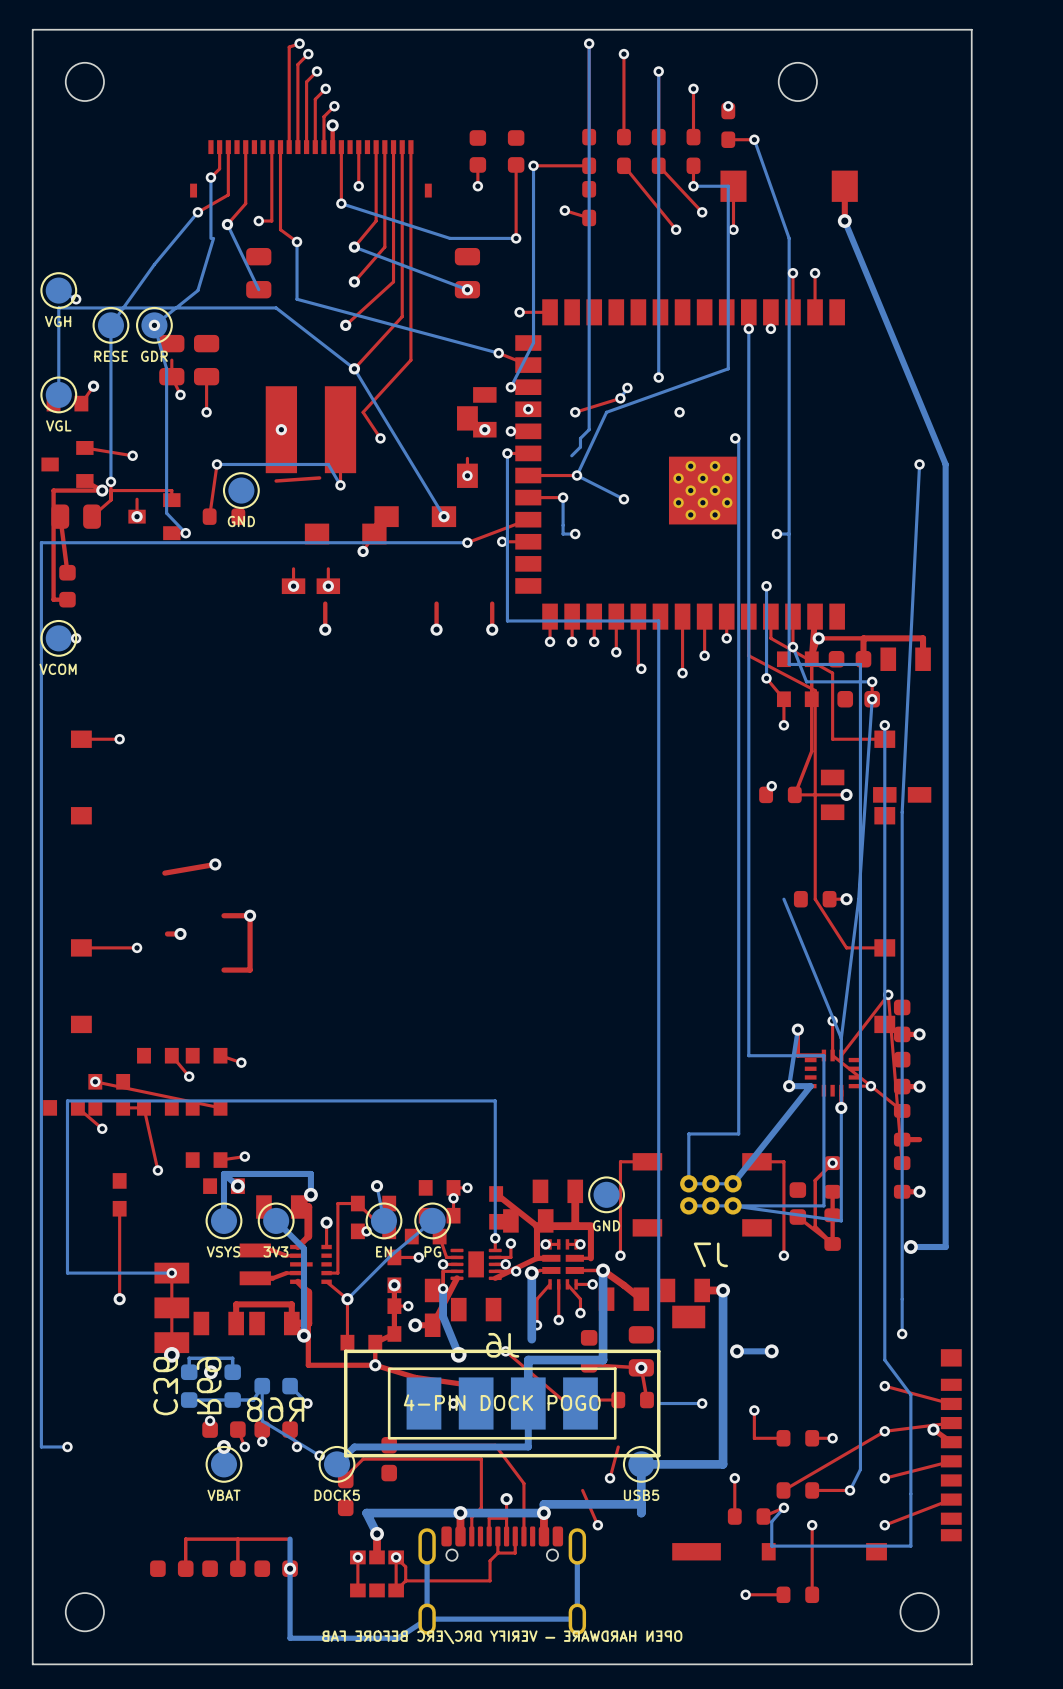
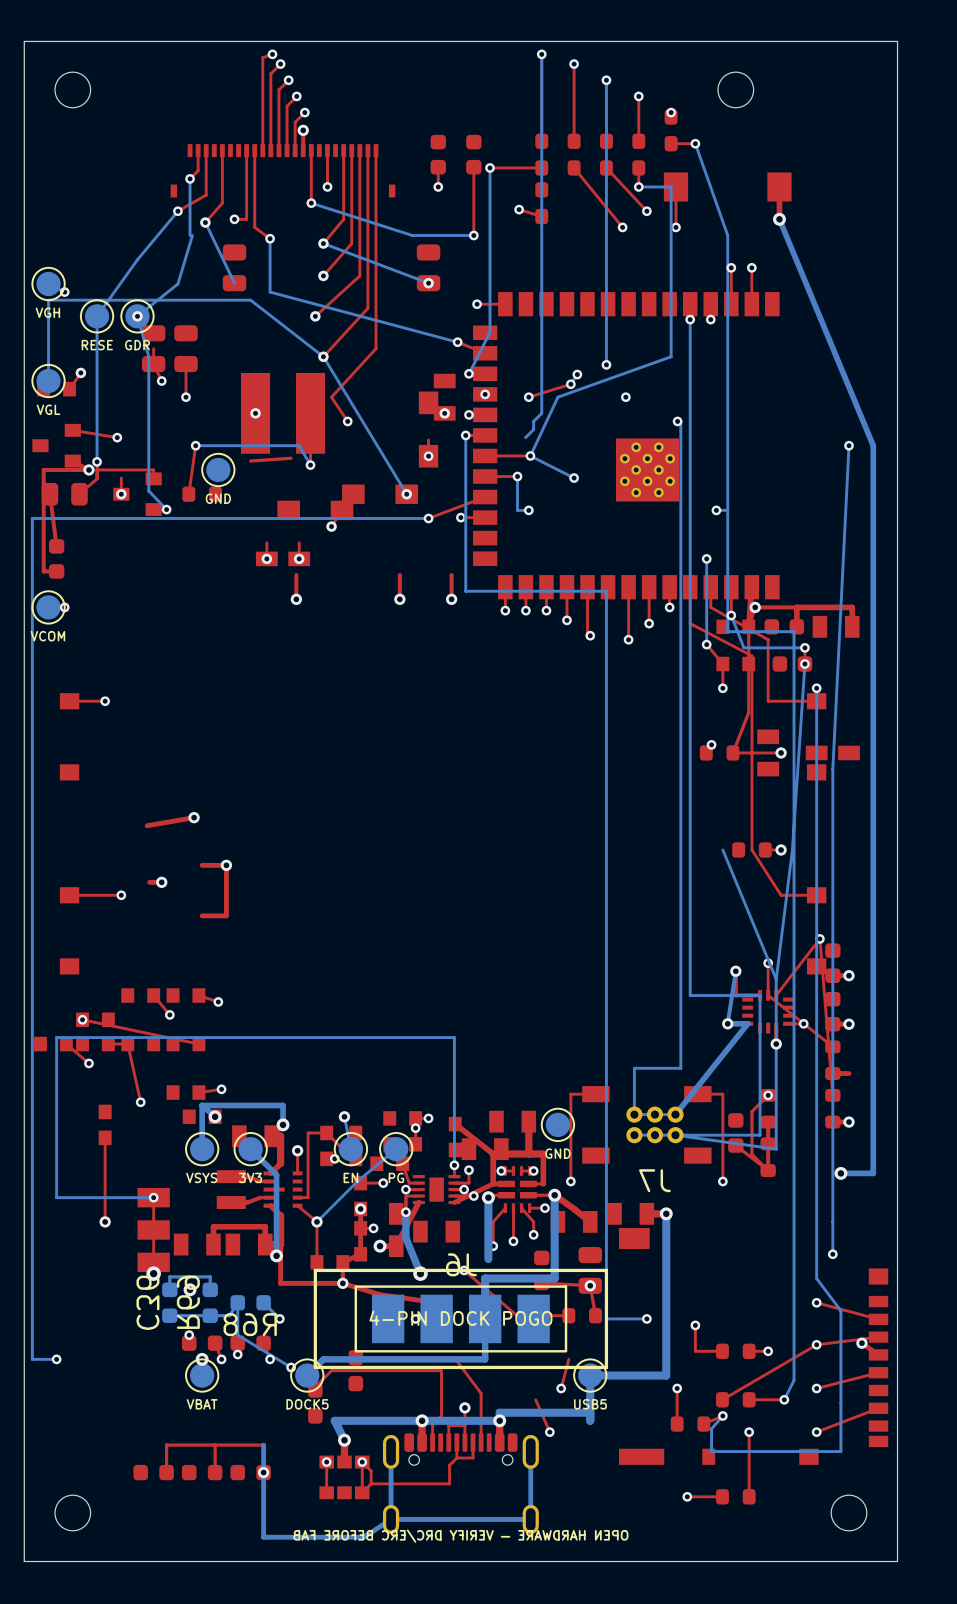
via: (736, 1351) -> none
bottom track: (771, 1351) (736, 1351) -> none
via: (771, 1351) -> none

